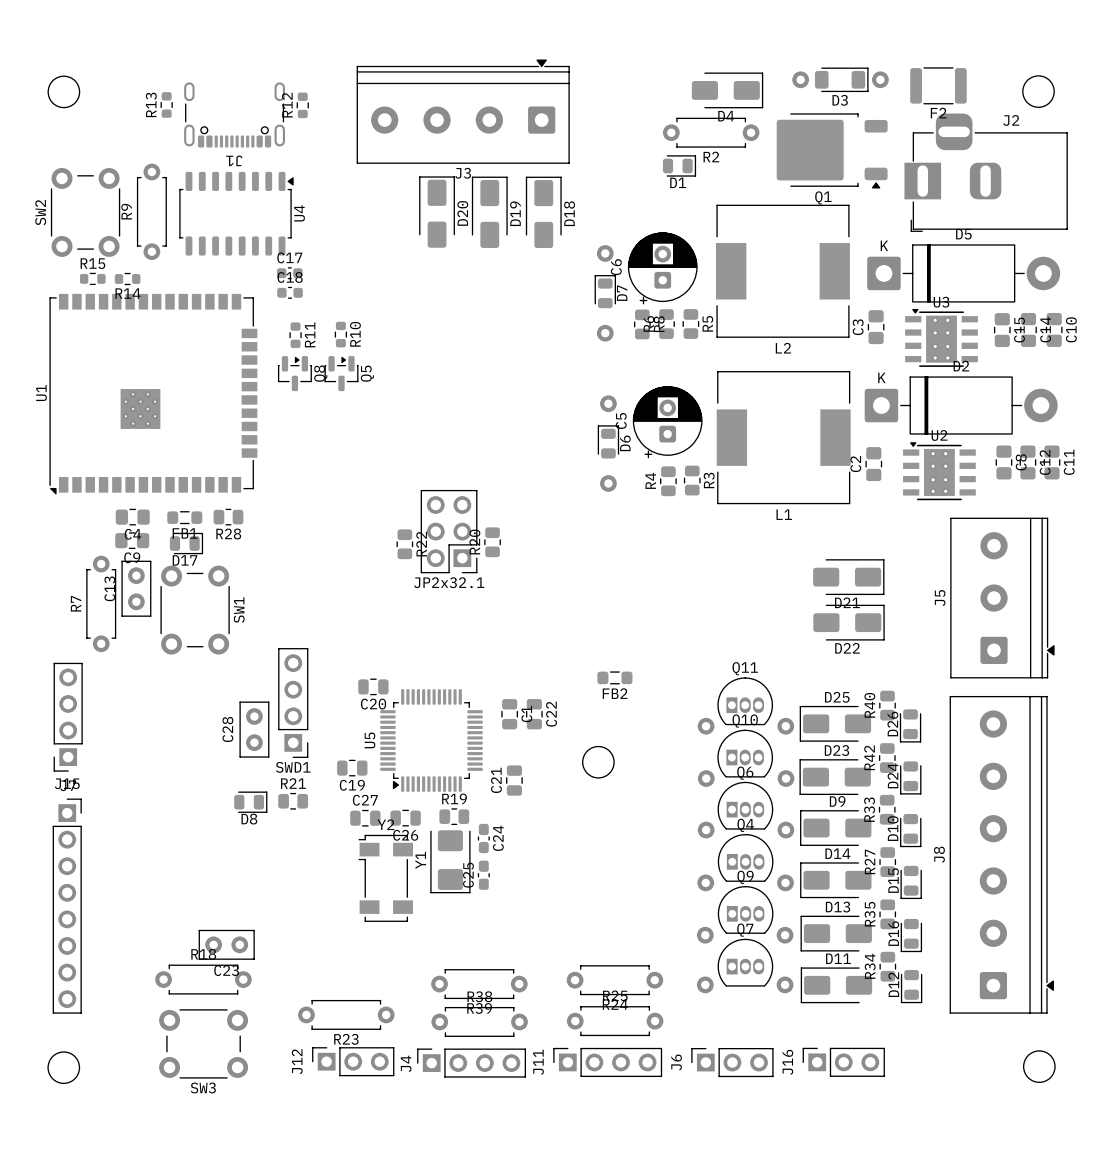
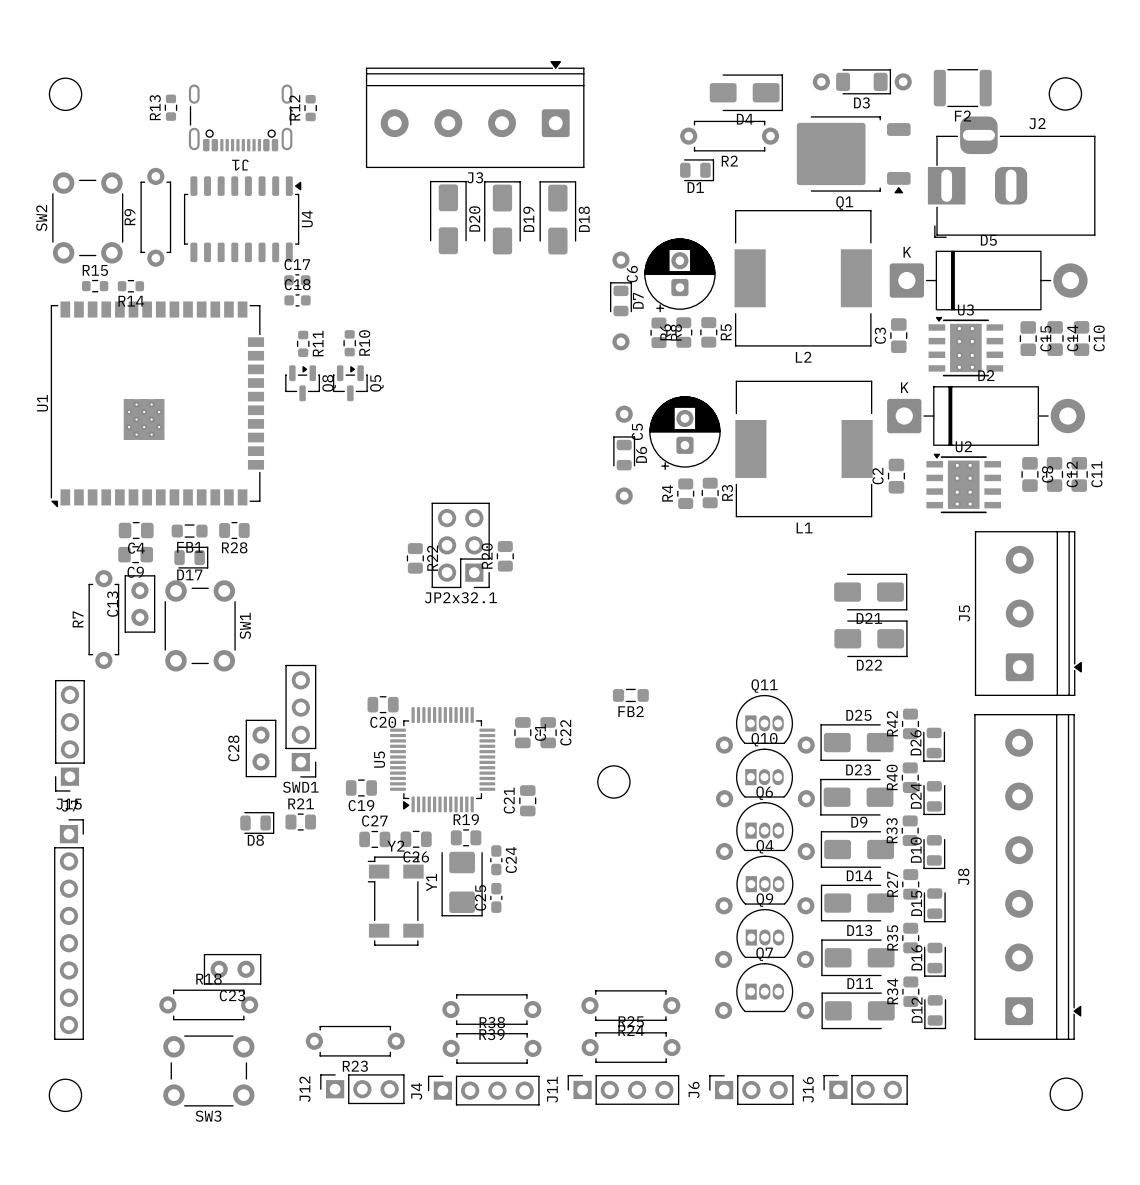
R40 name: R40 (869, 705) -> R42 (892, 723)
R42 name: R42 (869, 757) -> R40 (892, 777)

